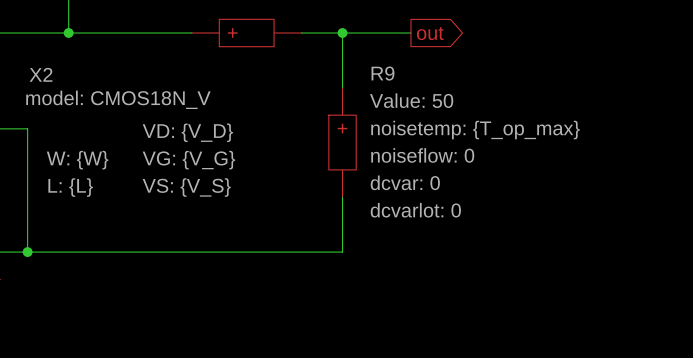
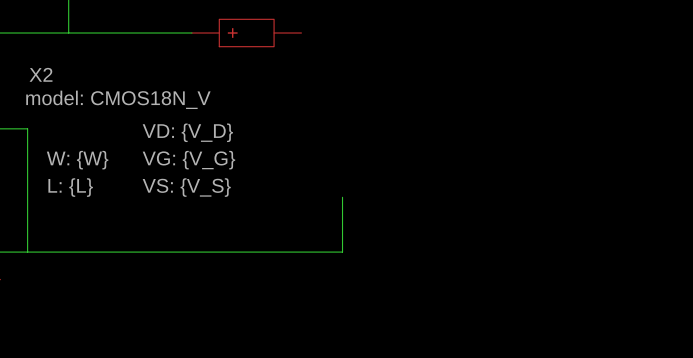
junction: (68, 33) -> none
wire: (301, 33) (410, 33) -> none
wire: (342, 33) (342, 87) -> none
junction: (342, 33) -> none
global label: out (430, 33) -> none
R9: Value: 50 (342, 142) -> none
junction: (27, 252) -> none

